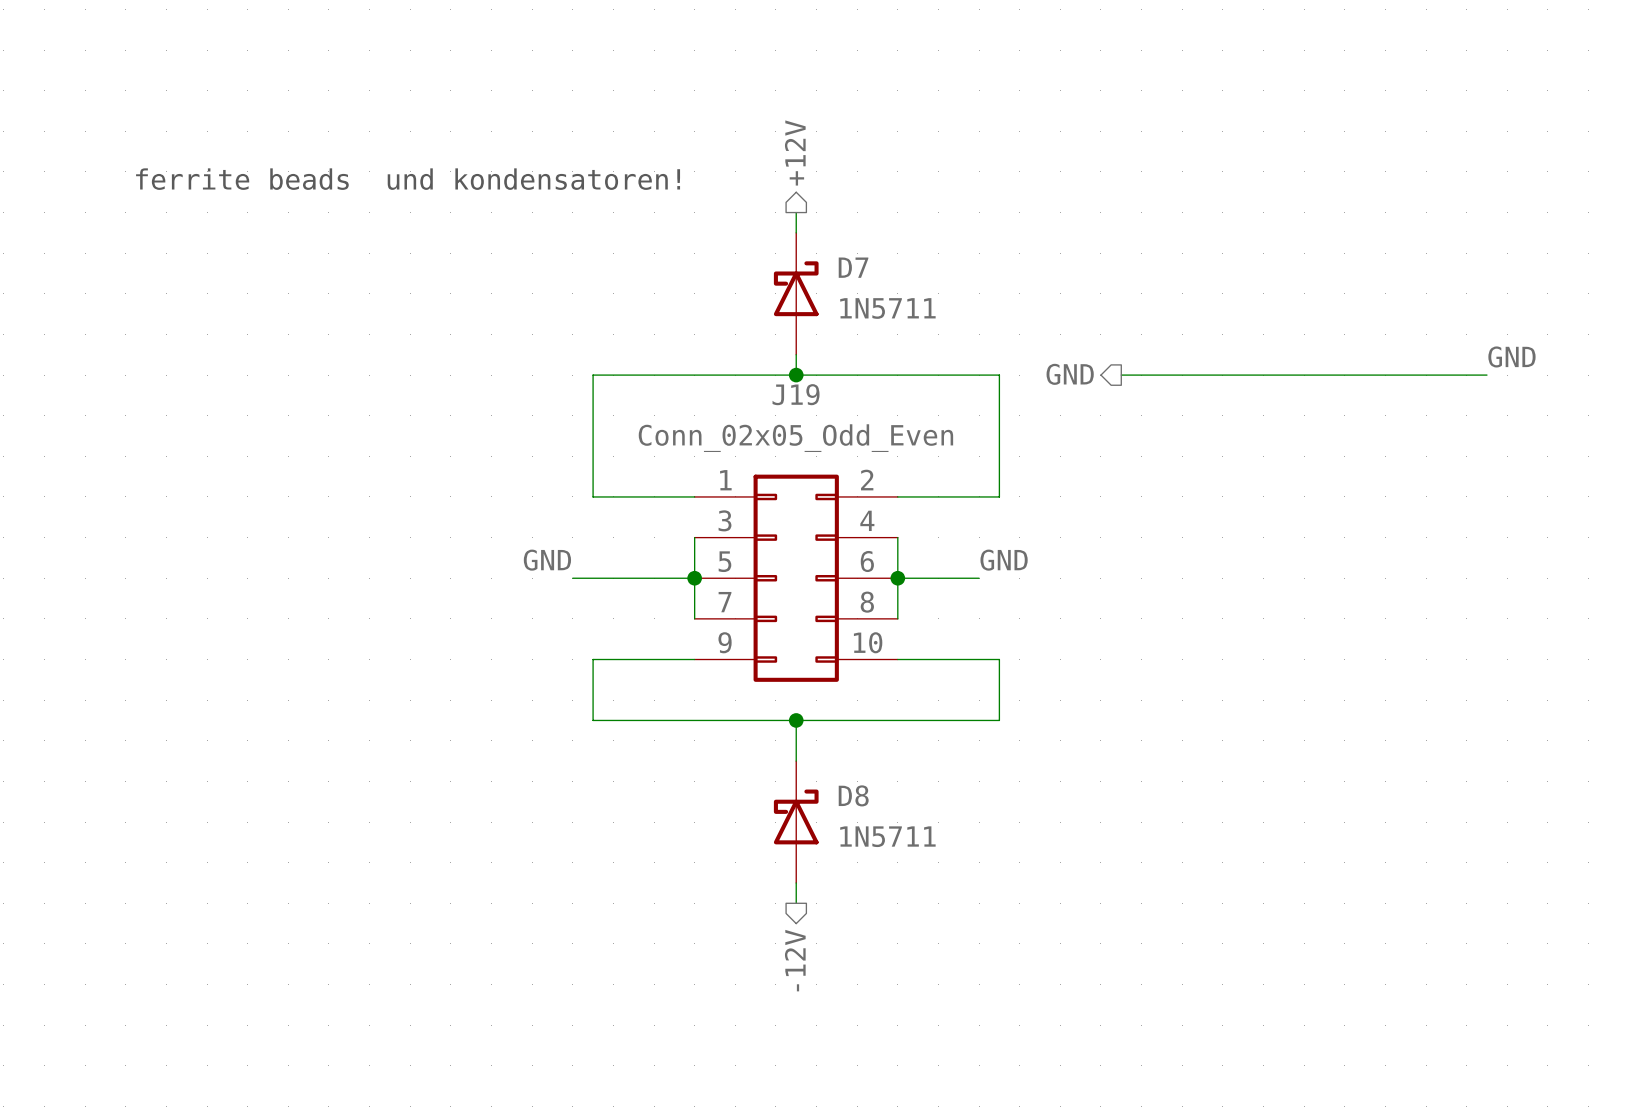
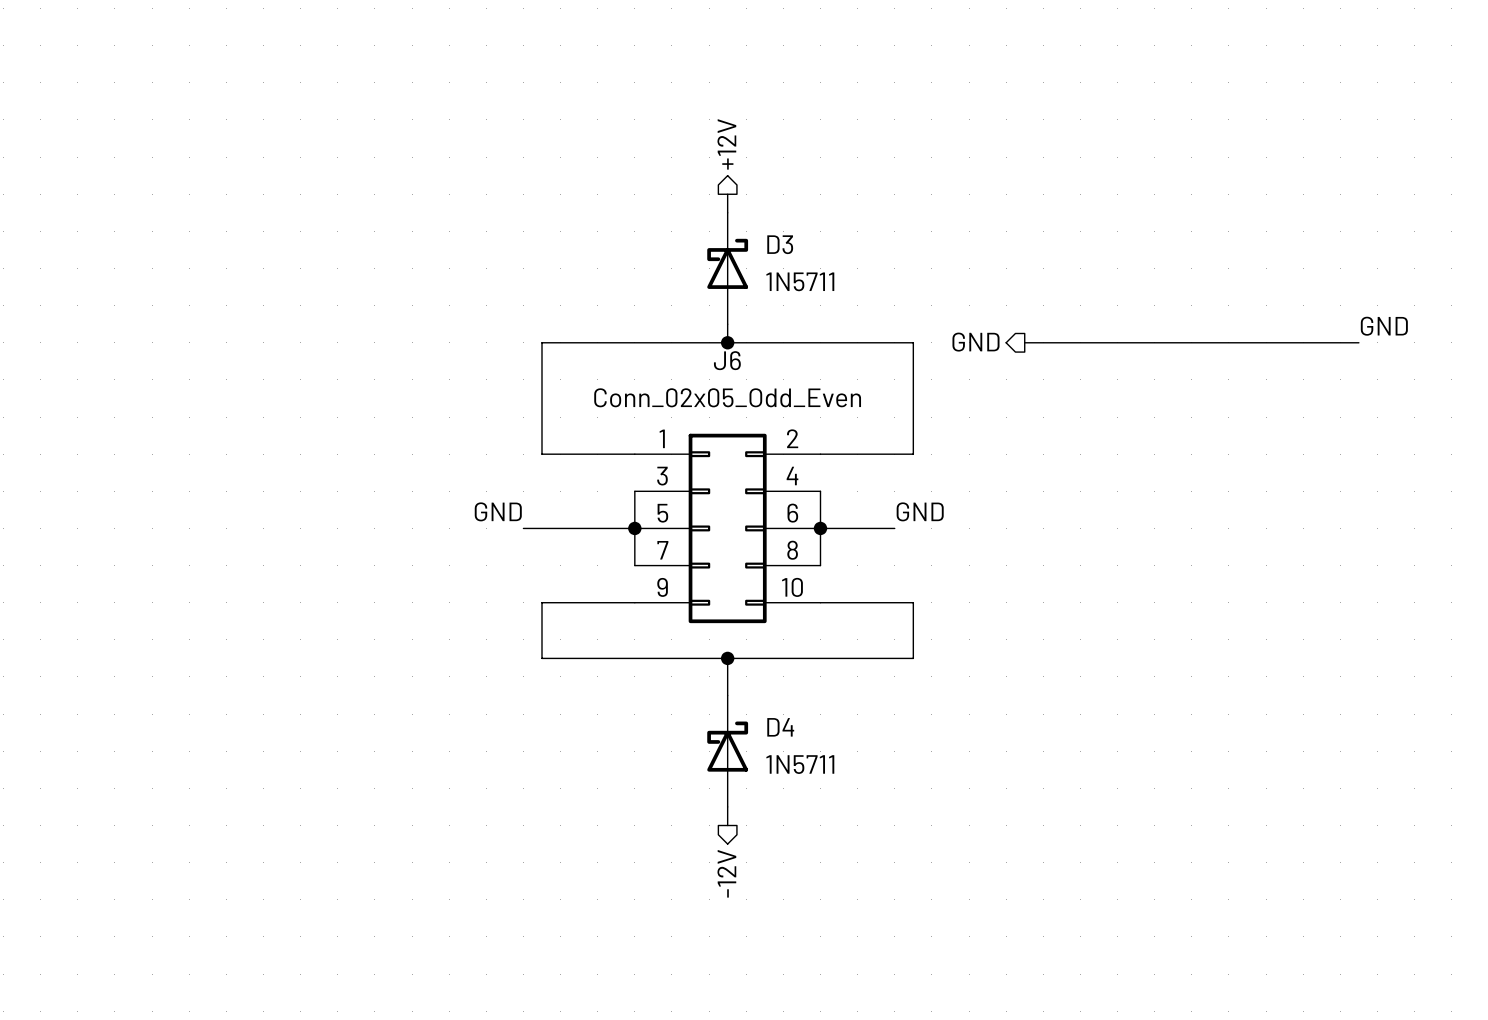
text: ferrite beads und kondensatoren! (408, 179) -> none
D7 name: D7 (853, 267) -> D3 (780, 244)
J19 name: J19 (796, 394) -> J6 (727, 360)
D8 name: D8 (853, 795) -> D4 (780, 727)

